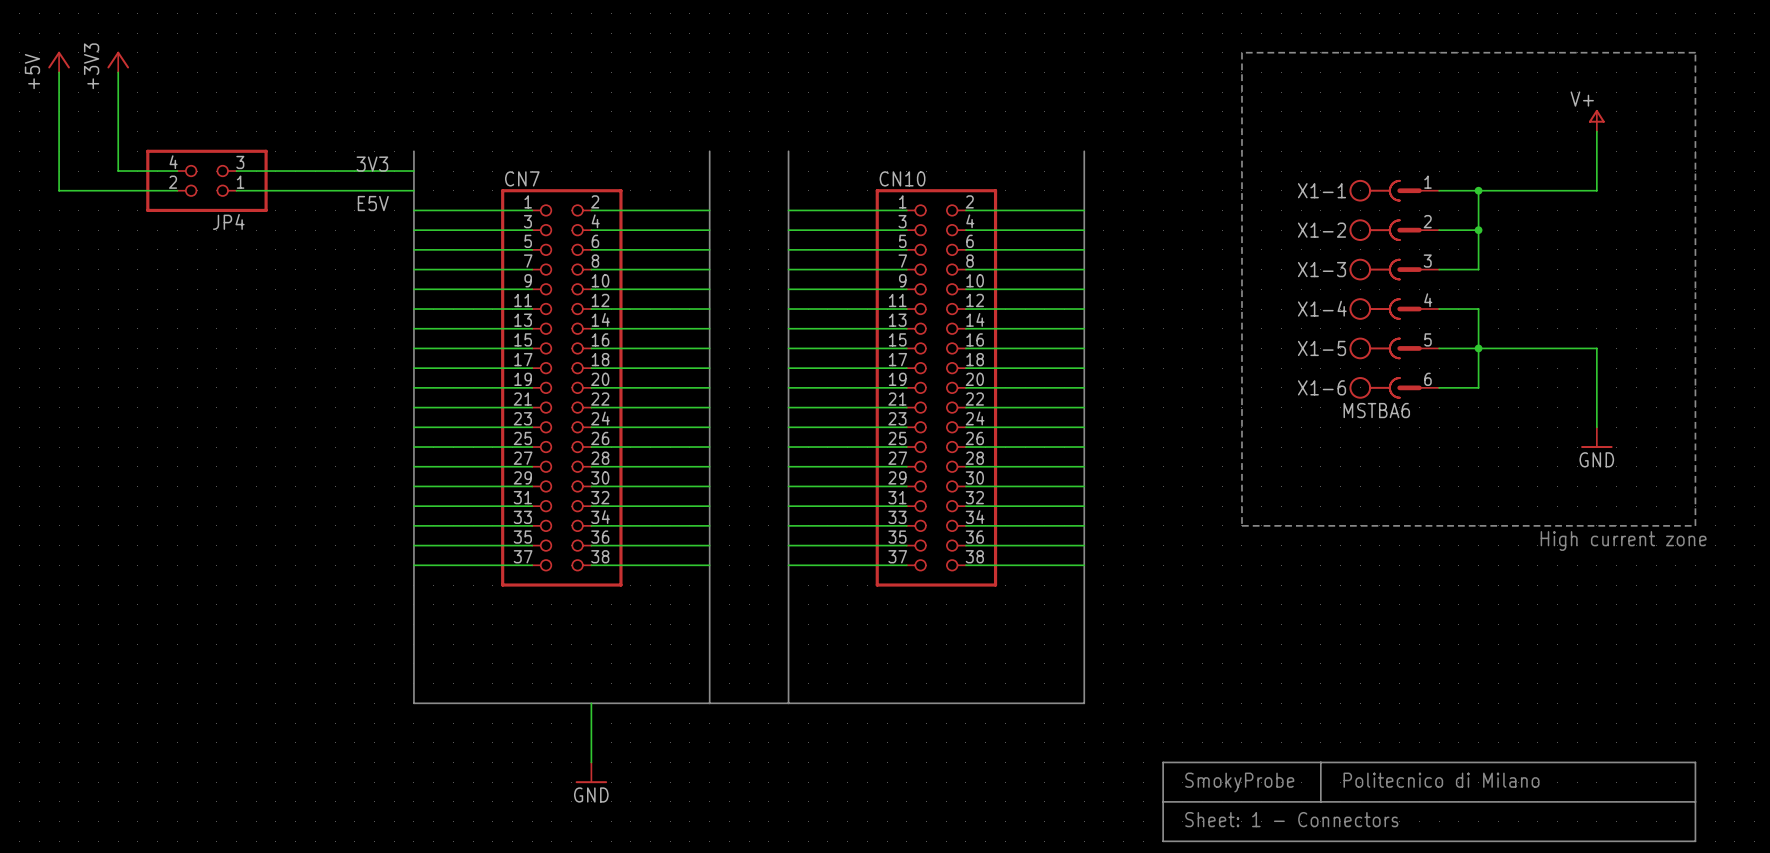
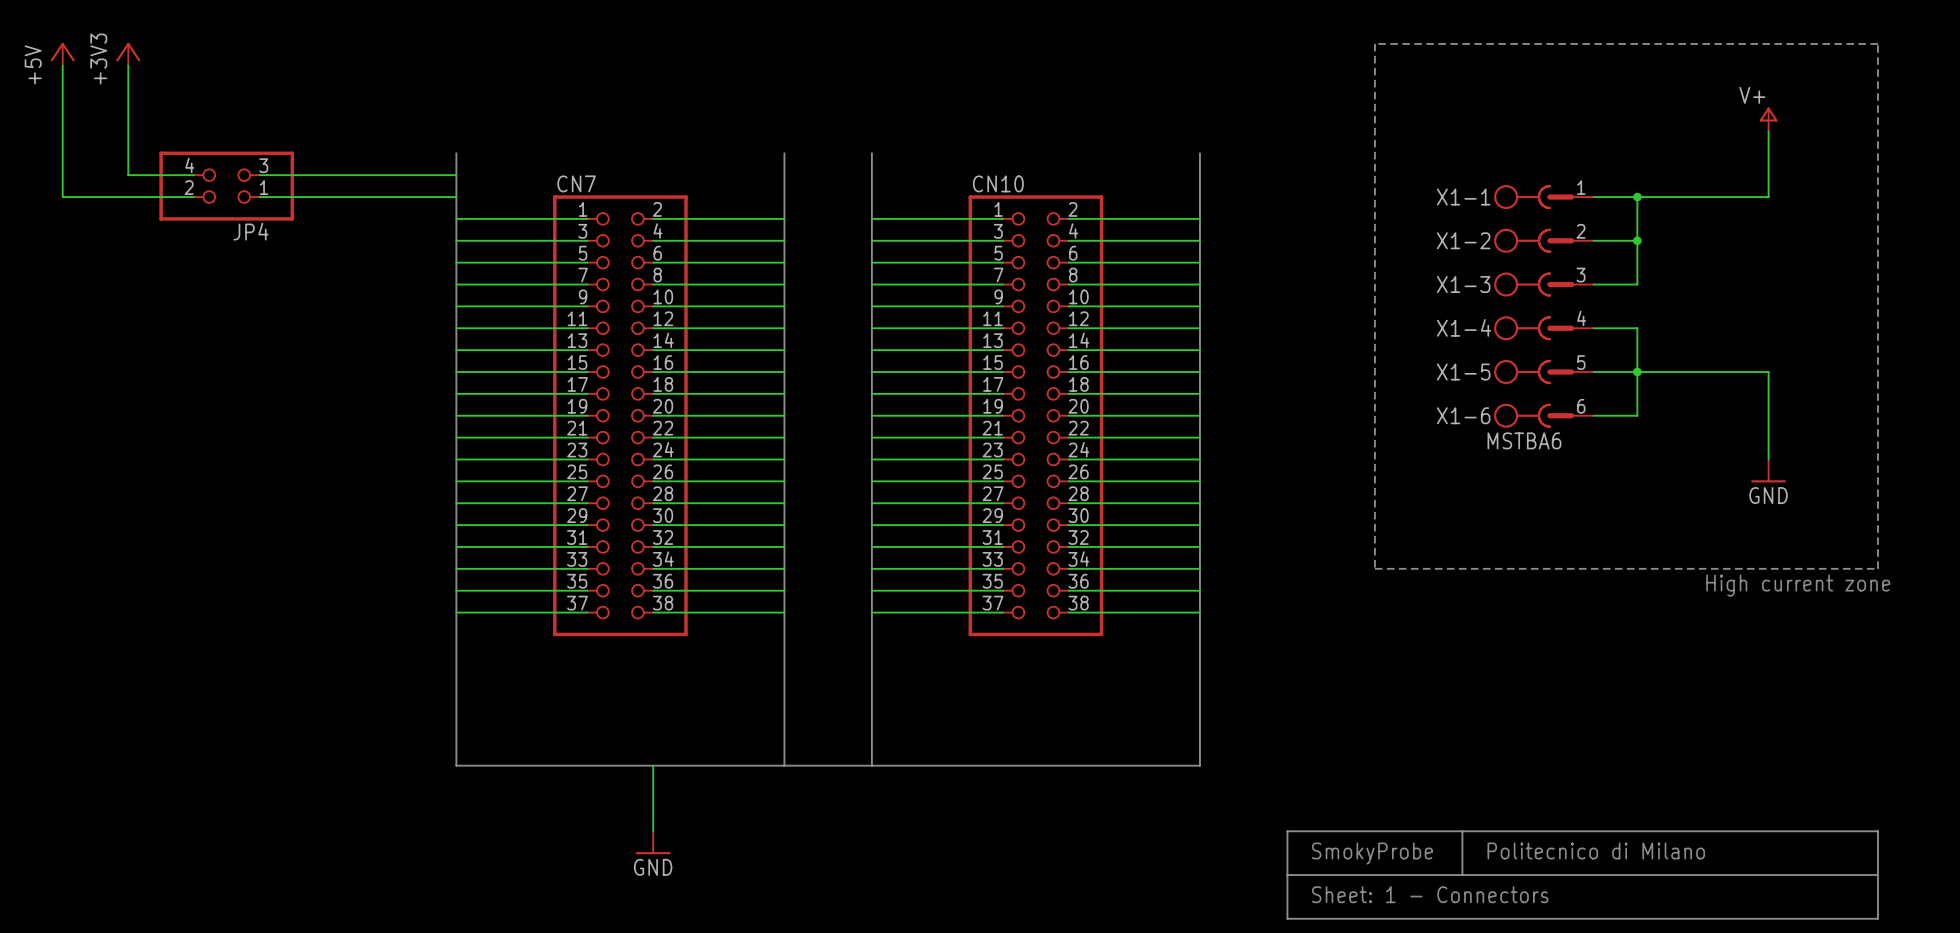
label: 3V3 (372, 164) -> none
label: E5V (373, 203) -> none

